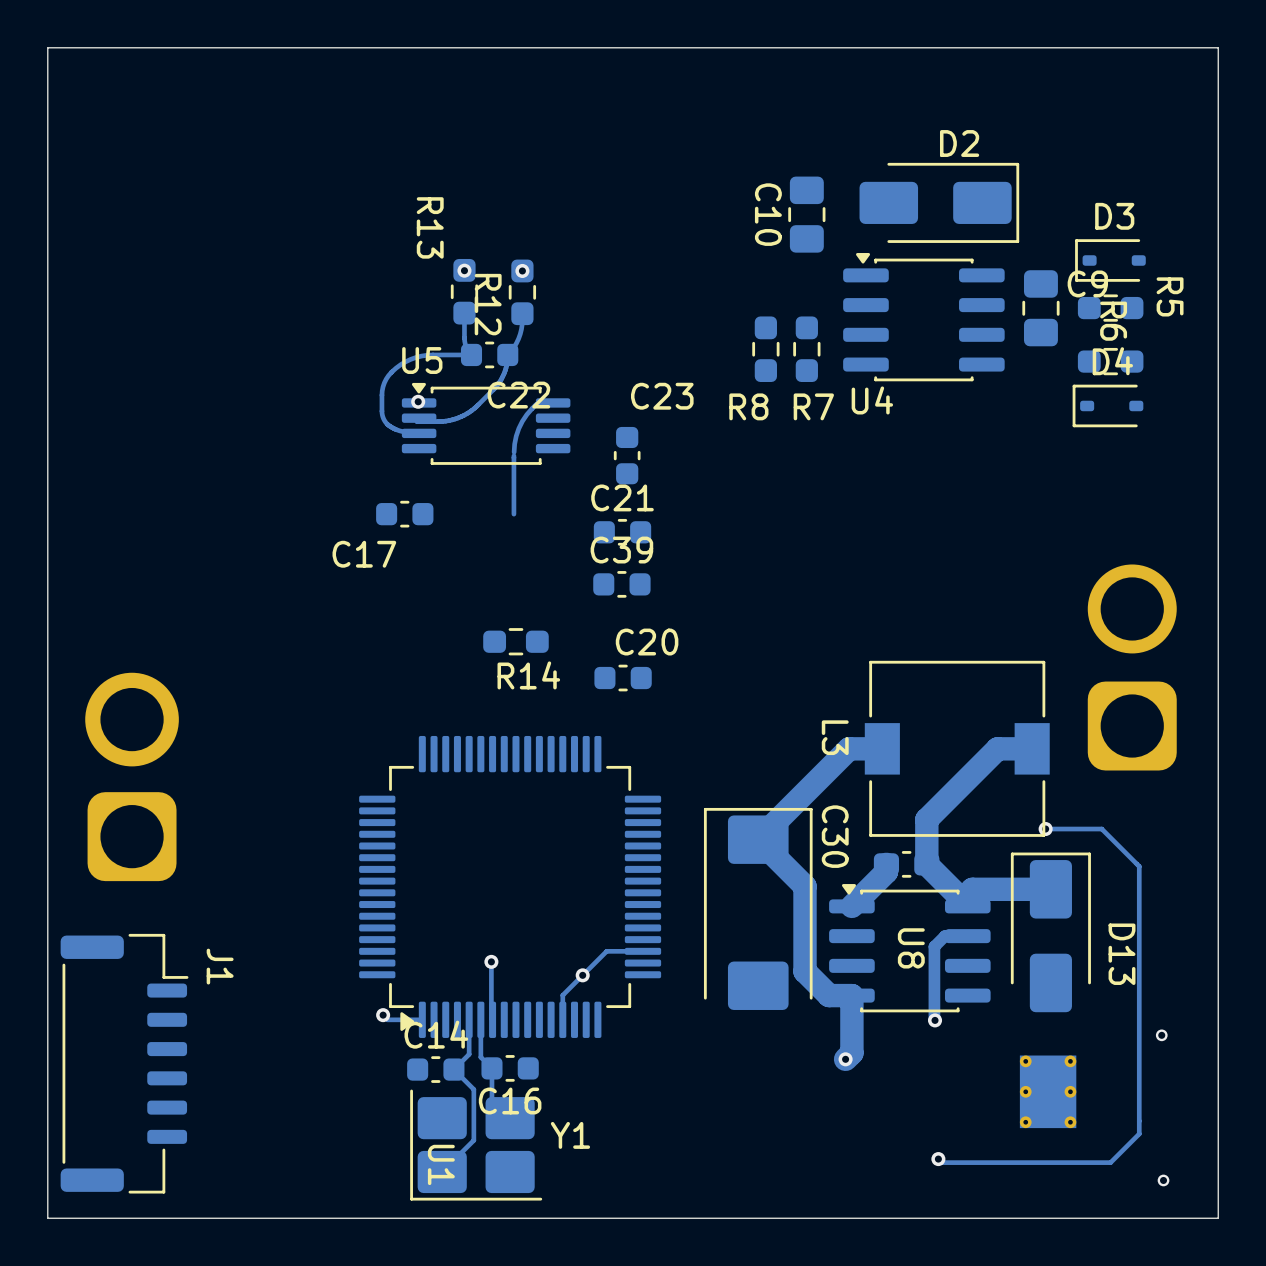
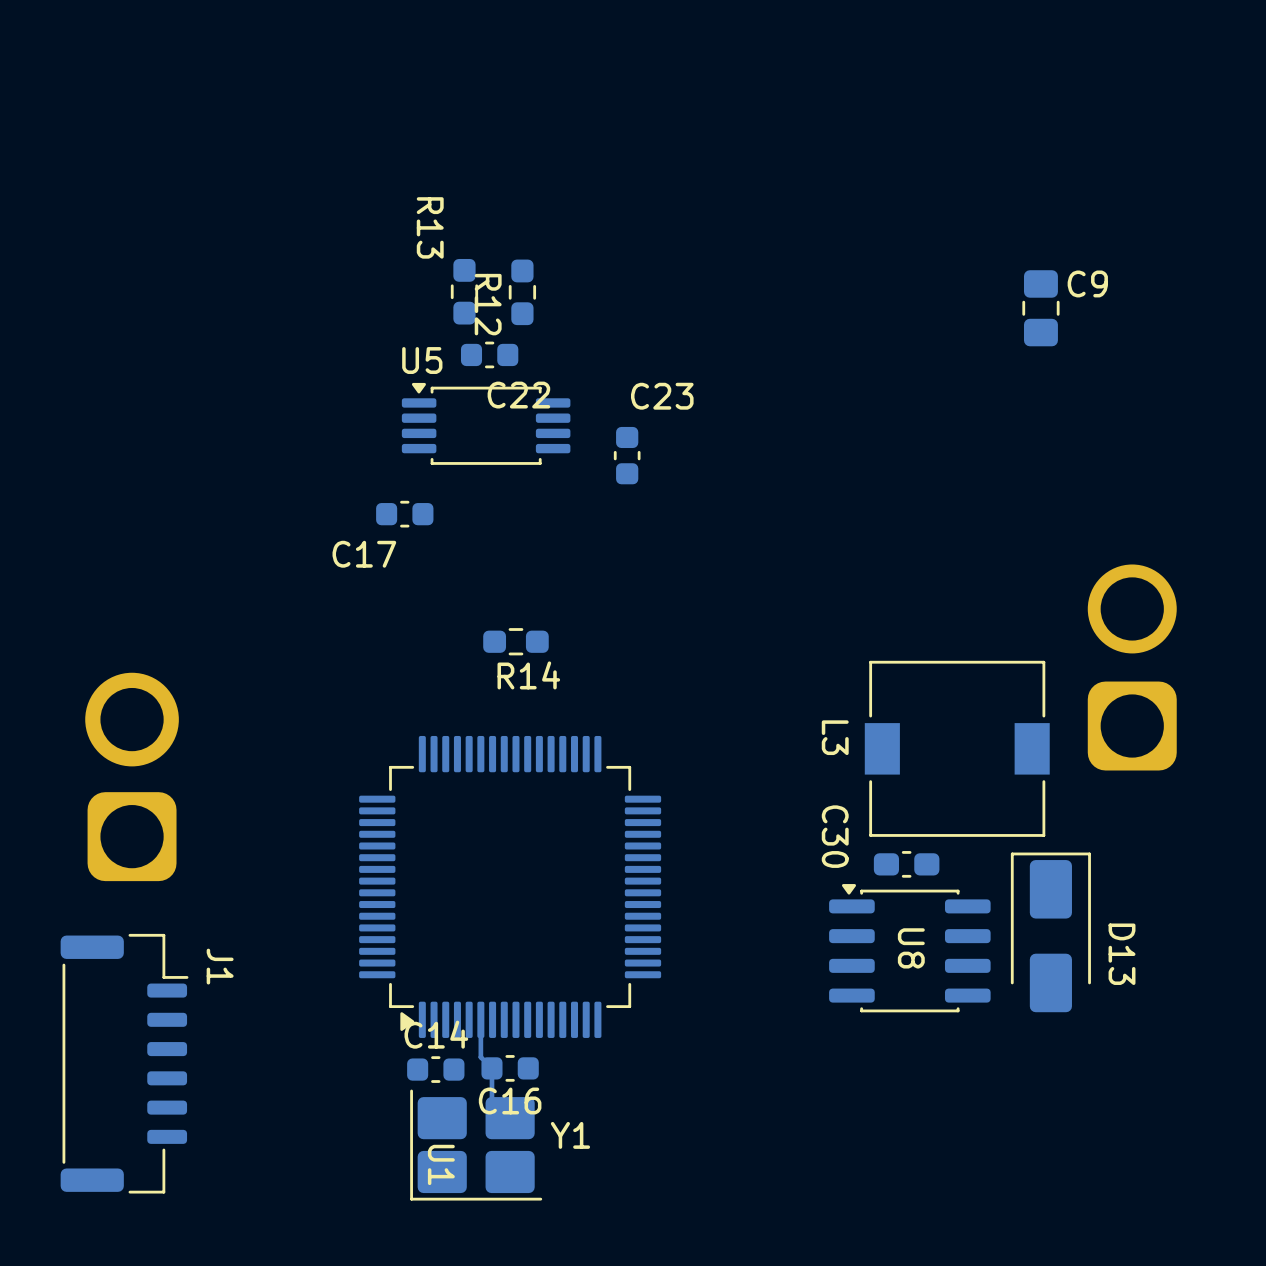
board edge: (1218, 47) (47, 47) (47, 1218) (1218, 1218) (1218, 47) -> none
D2: (939, 202) -> none
C10: (806, 214) -> none
D3: (1110, 260) -> none
via: (464, 270) -> none
via: (522, 270) -> none
R5: (1110, 308) -> none
track: (464, 313) (464, 341) (471, 354) (421, 356) (405, 361) (396, 368) (386, 379) (382, 390) (382, 414) (387, 424) -> none
track: (522, 313) (518, 338) (507, 354) (502, 376) (493, 389) (474, 408) (458, 417) (442, 421) (417, 421) (419, 418) -> none
U4: (923, 317) -> none
R8: (765, 349) -> none
R7: (806, 349) -> none
R6: (1110, 361) -> none
via: (418, 401) -> none
track: (553, 402) (537, 403) (526, 414) (518, 428) (514, 452) -> none
D4: (1107, 405) -> none
track: (387, 424) (399, 430) (411, 432) -> none
track: (513, 455) (513, 514) -> none
C21: (622, 532) -> none
C39: (621, 584) -> none
C20: (623, 678) -> none
track: (882, 748) (849, 748) (758, 839) (805, 886) (805, 971) (829, 995) (851, 995) (851, 1053) (845, 1059) -> none
track: (1032, 748) (997, 748) (926, 819) (926, 864) (958, 895) (966, 895) (972, 889) (1050, 889) -> none
track: (1045, 829) (1101, 829) (1139, 866) (1139, 1133) (1110, 1162) (941, 1162) (938, 1159) -> none
via: (1045, 829) -> none
track: (886, 864) (886, 871) (851, 906) -> none
part: (758, 908) -> none
track: (967, 936) (944, 936) (934, 946) (935, 1020) -> none
track: (642, 951) (606, 951) (562, 995) (562, 1019) -> none
track: (491, 961) (492, 1019) -> none
via: (491, 961) -> none
via: (582, 975) -> none
track: (383, 1015) (387, 1019) (422, 1019) -> none
via: (383, 1015) -> none
track: (469, 1019) (469, 1054) (453, 1069) (473, 1089) (473, 1140) (442, 1171) -> none
via: (935, 1020) -> none
via: (1161, 1035) -> none
via: (845, 1059) -> none
part: (1048, 1091) -> none
via: (938, 1159) -> none
via: (1163, 1180) -> none

